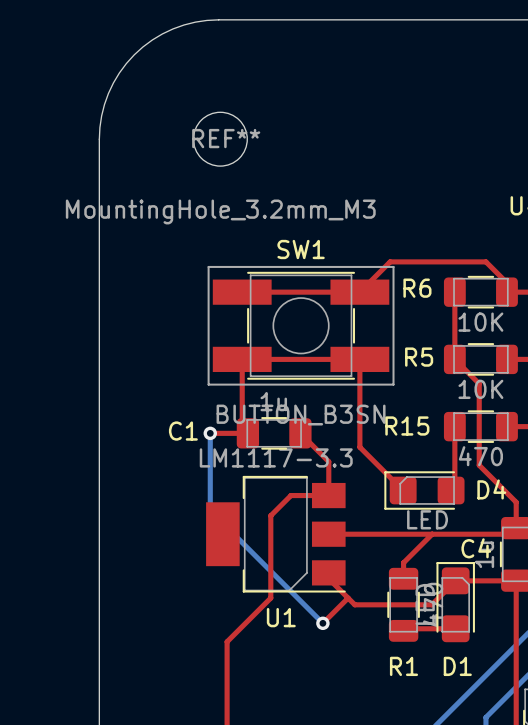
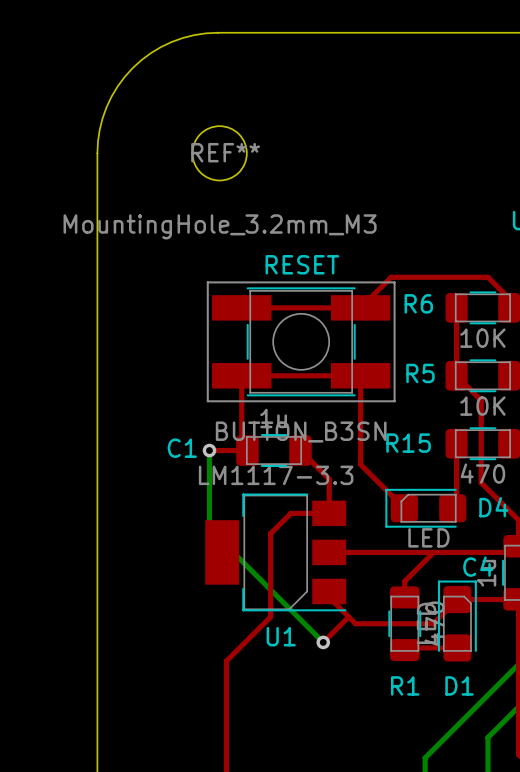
SW1 name: SW1 (301, 249) -> RESET (302, 264)

